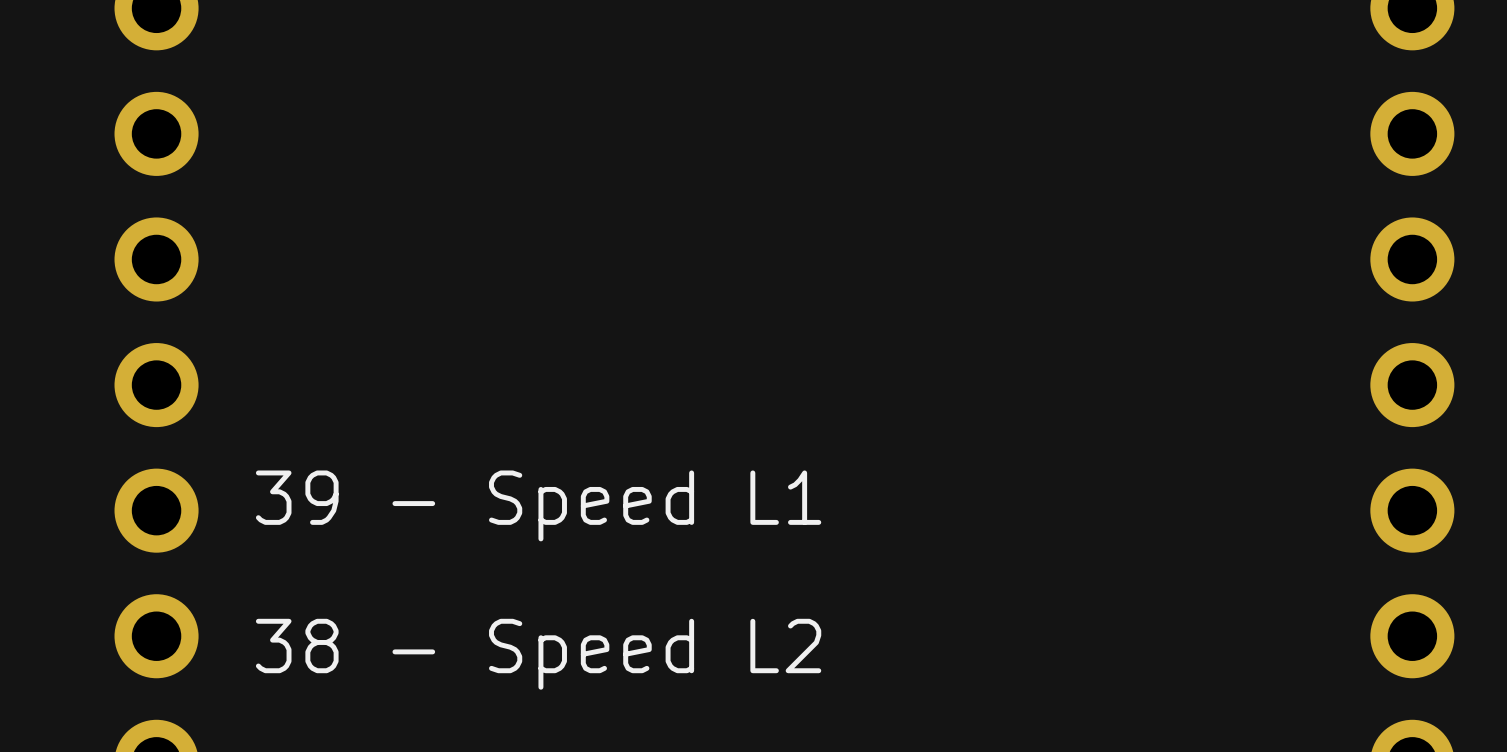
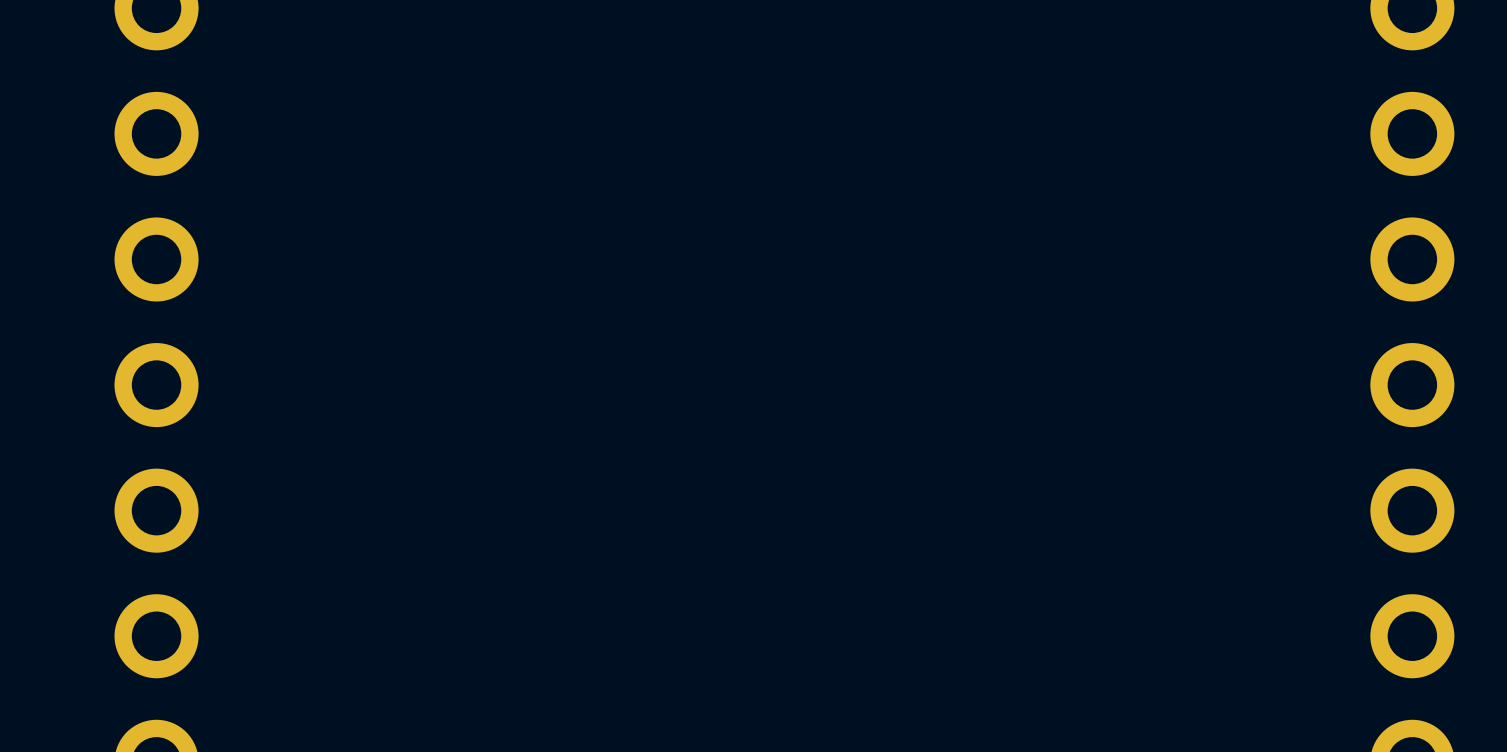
text: 39 - Speed L1 (538, 505) -> none
text: 38 - Speed L2 (538, 654) -> none

